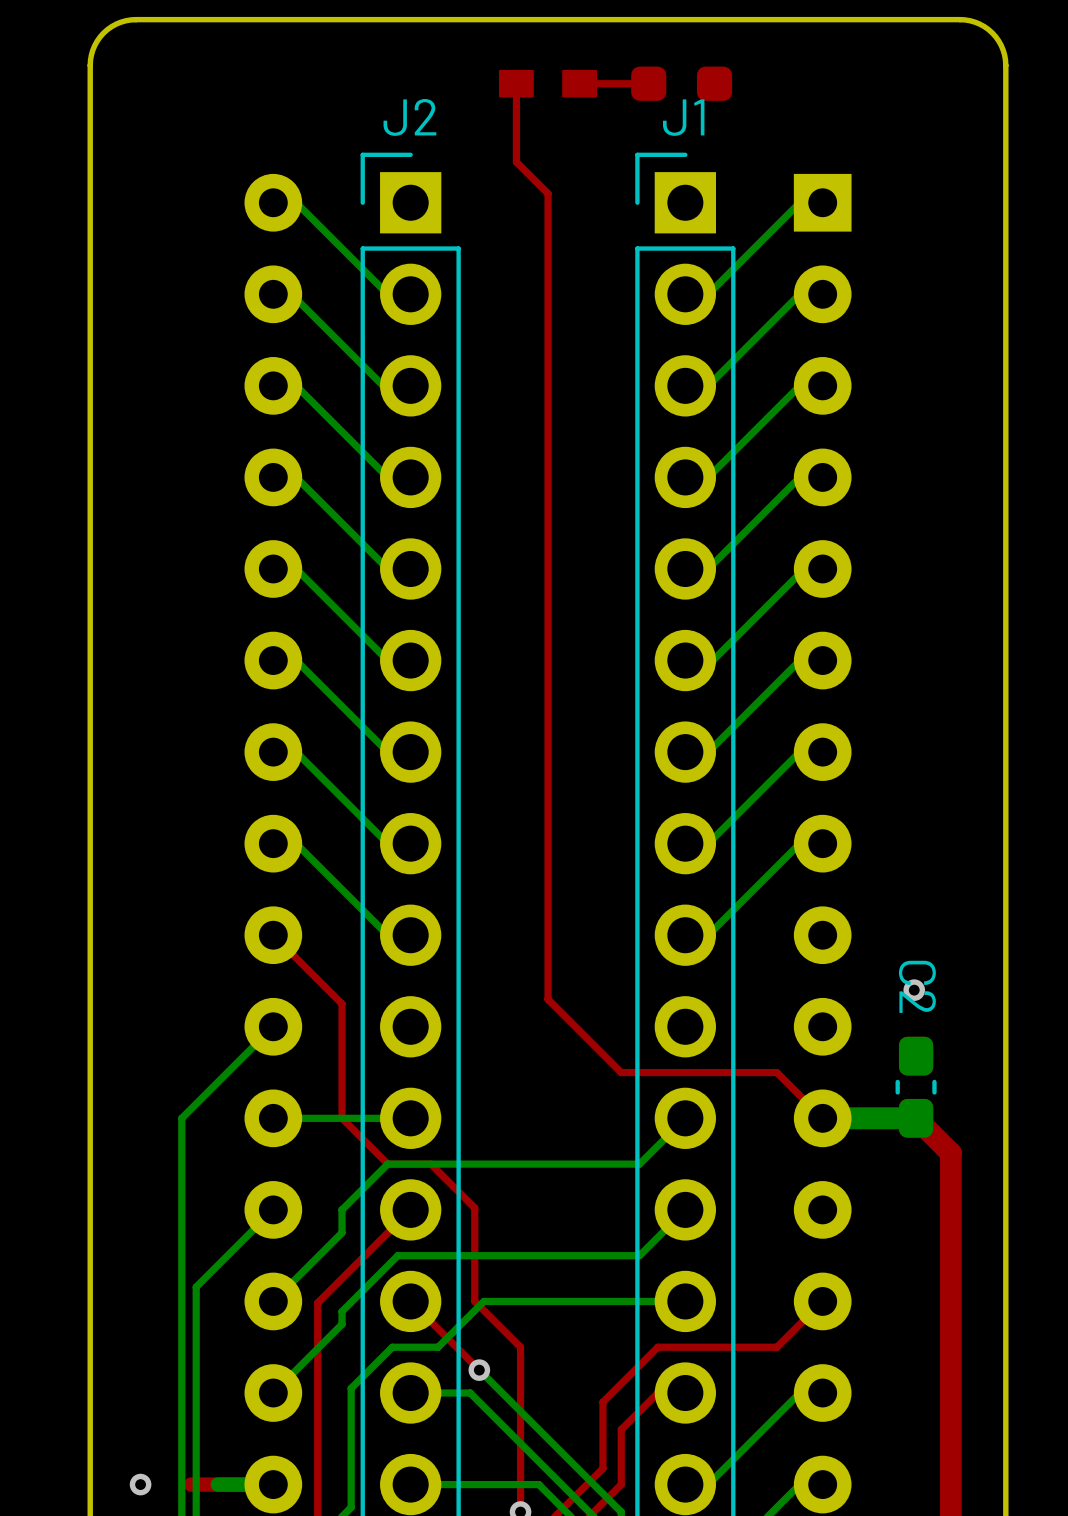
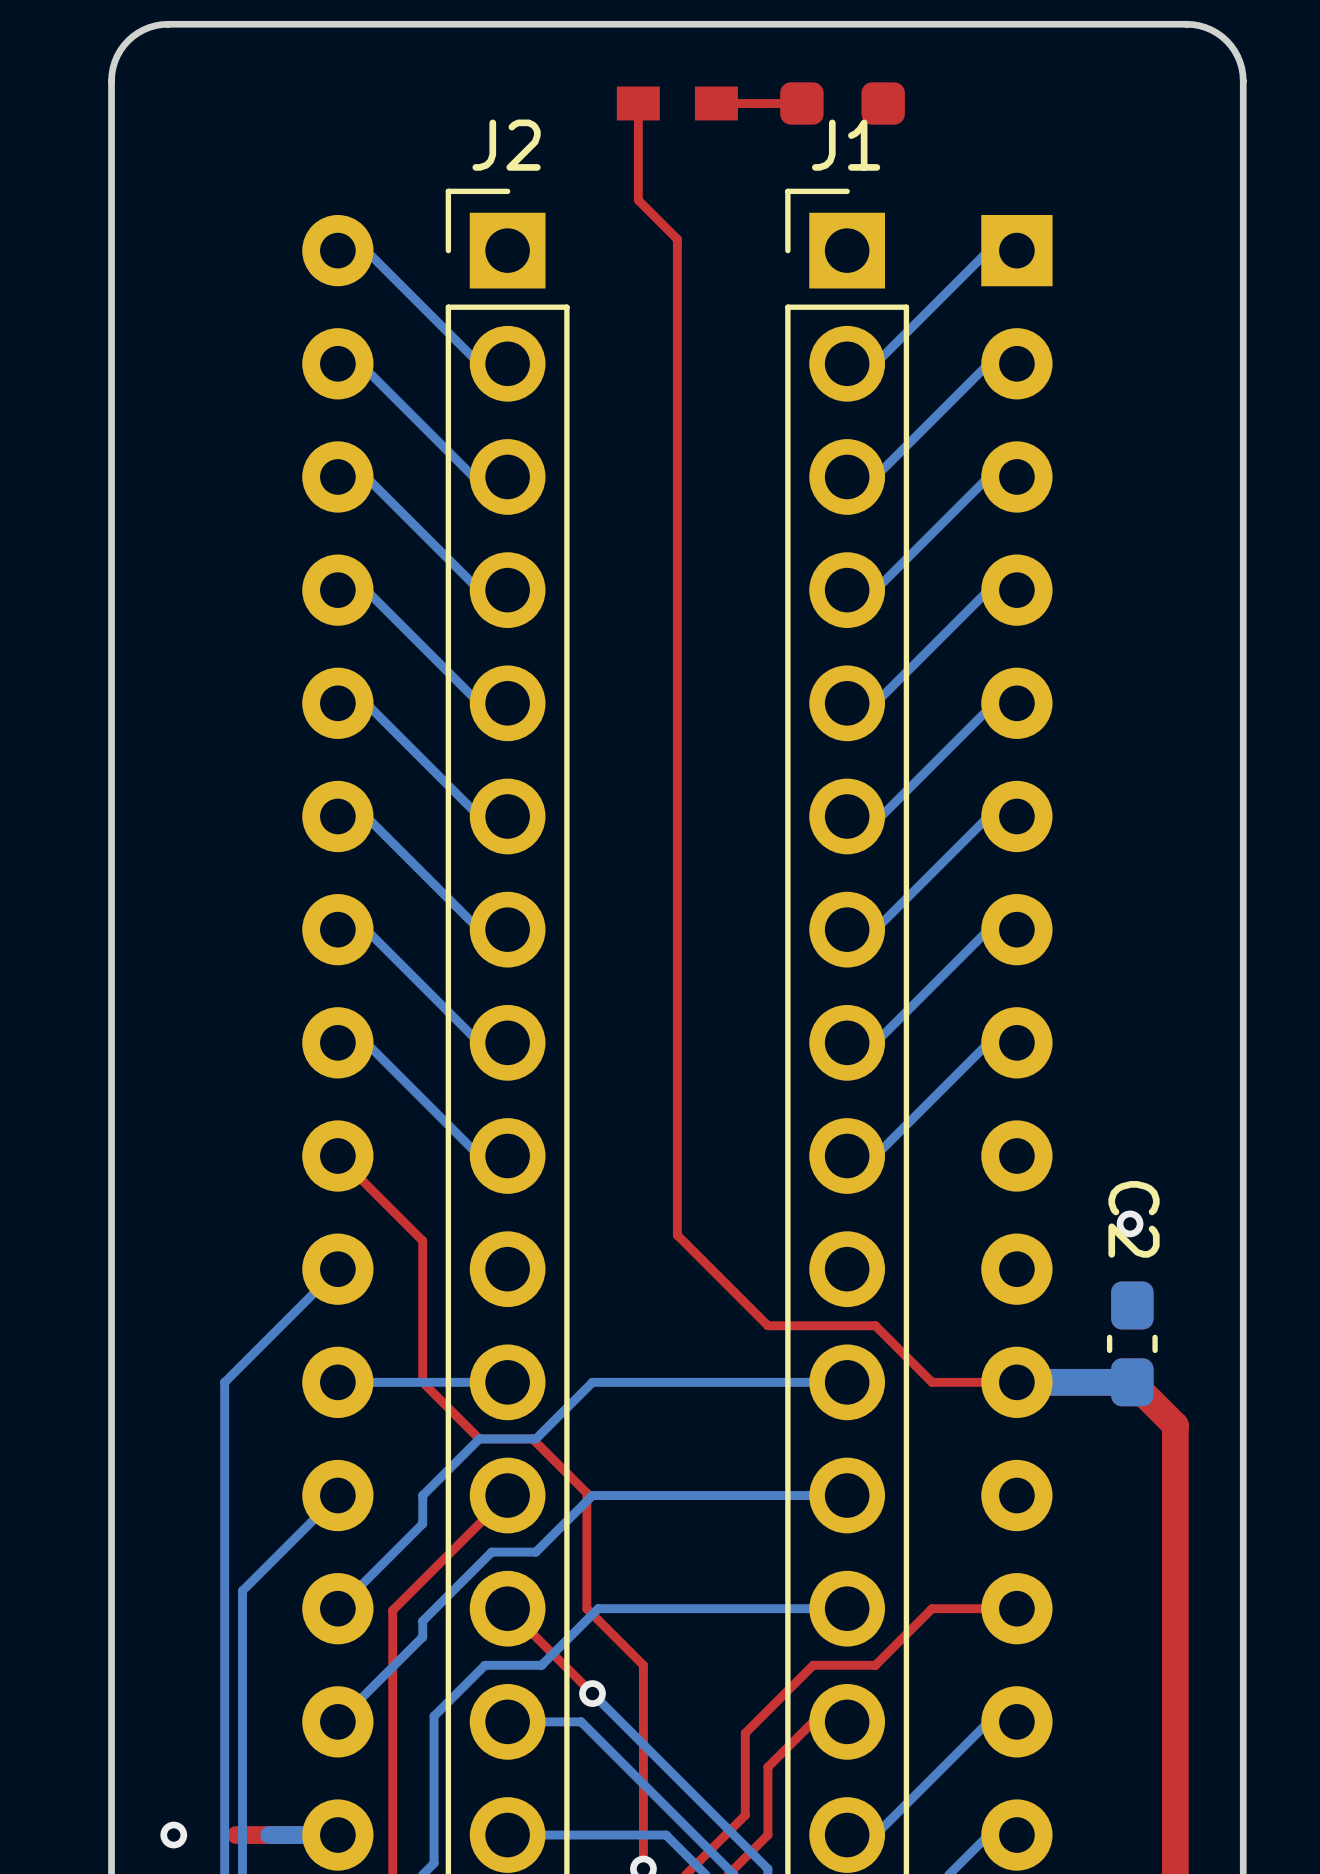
top track: (708, 1072) (776, 1072) (822, 1118) -> (875, 1325) (932, 1382) (1016, 1382)
bottom track: (685, 1118) (639, 1164) (433, 1164) -> (847, 1382) (592, 1382) (535, 1438)
bottom track: (685, 1209) (639, 1255) (433, 1255) -> (847, 1495) (592, 1495) (535, 1552)
top track: (822, 1301) (776, 1347) (708, 1347) -> (1016, 1608) (932, 1608) (875, 1665)

